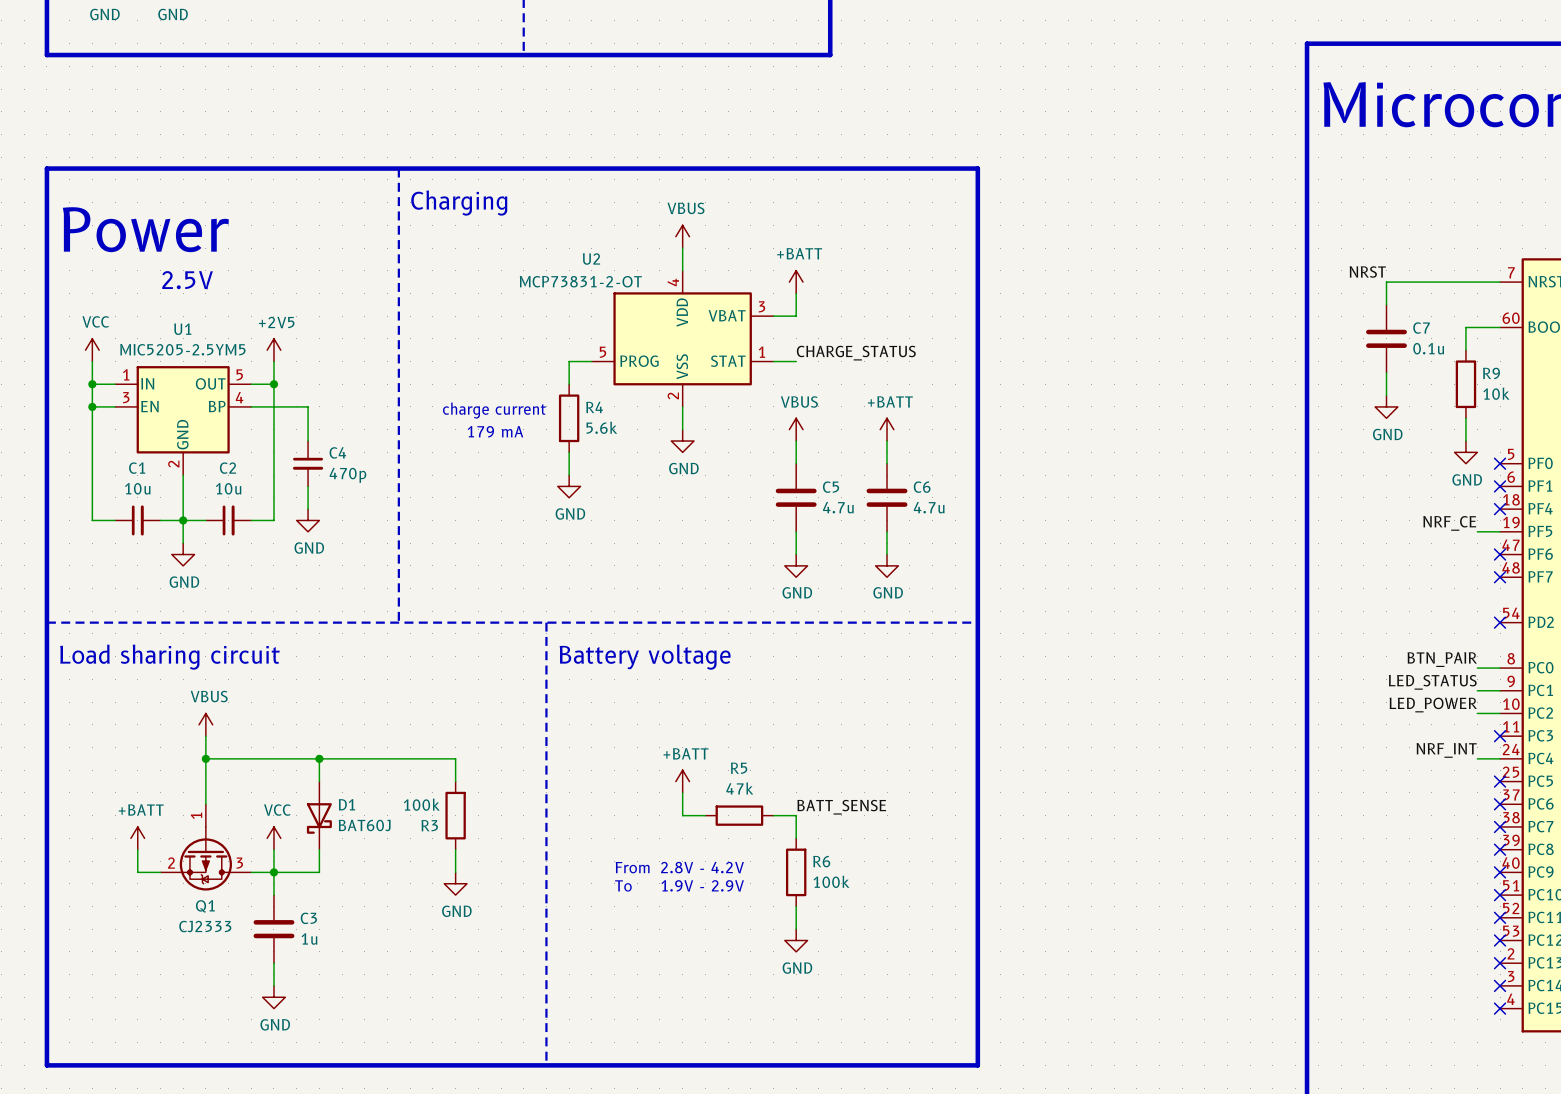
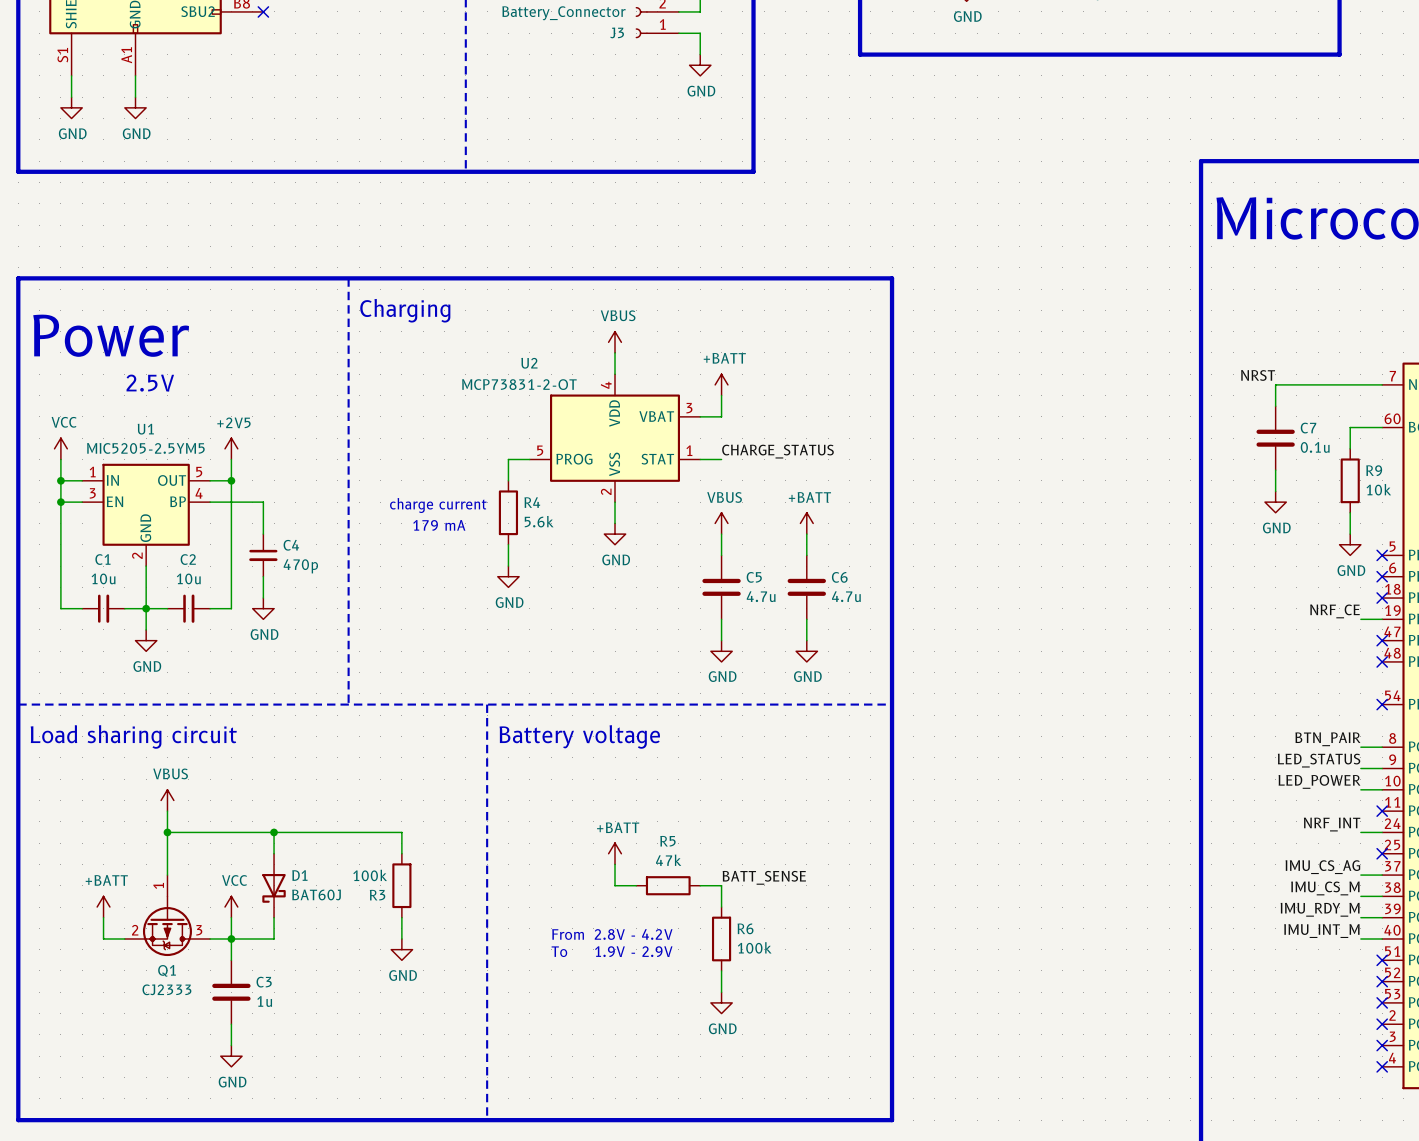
label: none -> IMU_CS_AG (1322, 867)
wire: none -> (1360, 875) (1382, 875)
no-connect mark: (1500, 804) -> none
label: none -> IMU_CS_M (1325, 888)
wire: none -> (1360, 896) (1382, 896)
no-connect mark: (1500, 826) -> none
label: none -> IMU_RDY_M (1320, 909)
wire: none -> (1360, 917) (1382, 917)
no-connect mark: (1500, 849) -> none
label: none -> IMU_INT_M (1321, 931)
wire: none -> (1360, 938) (1382, 938)
no-connect mark: (1500, 872) -> none

